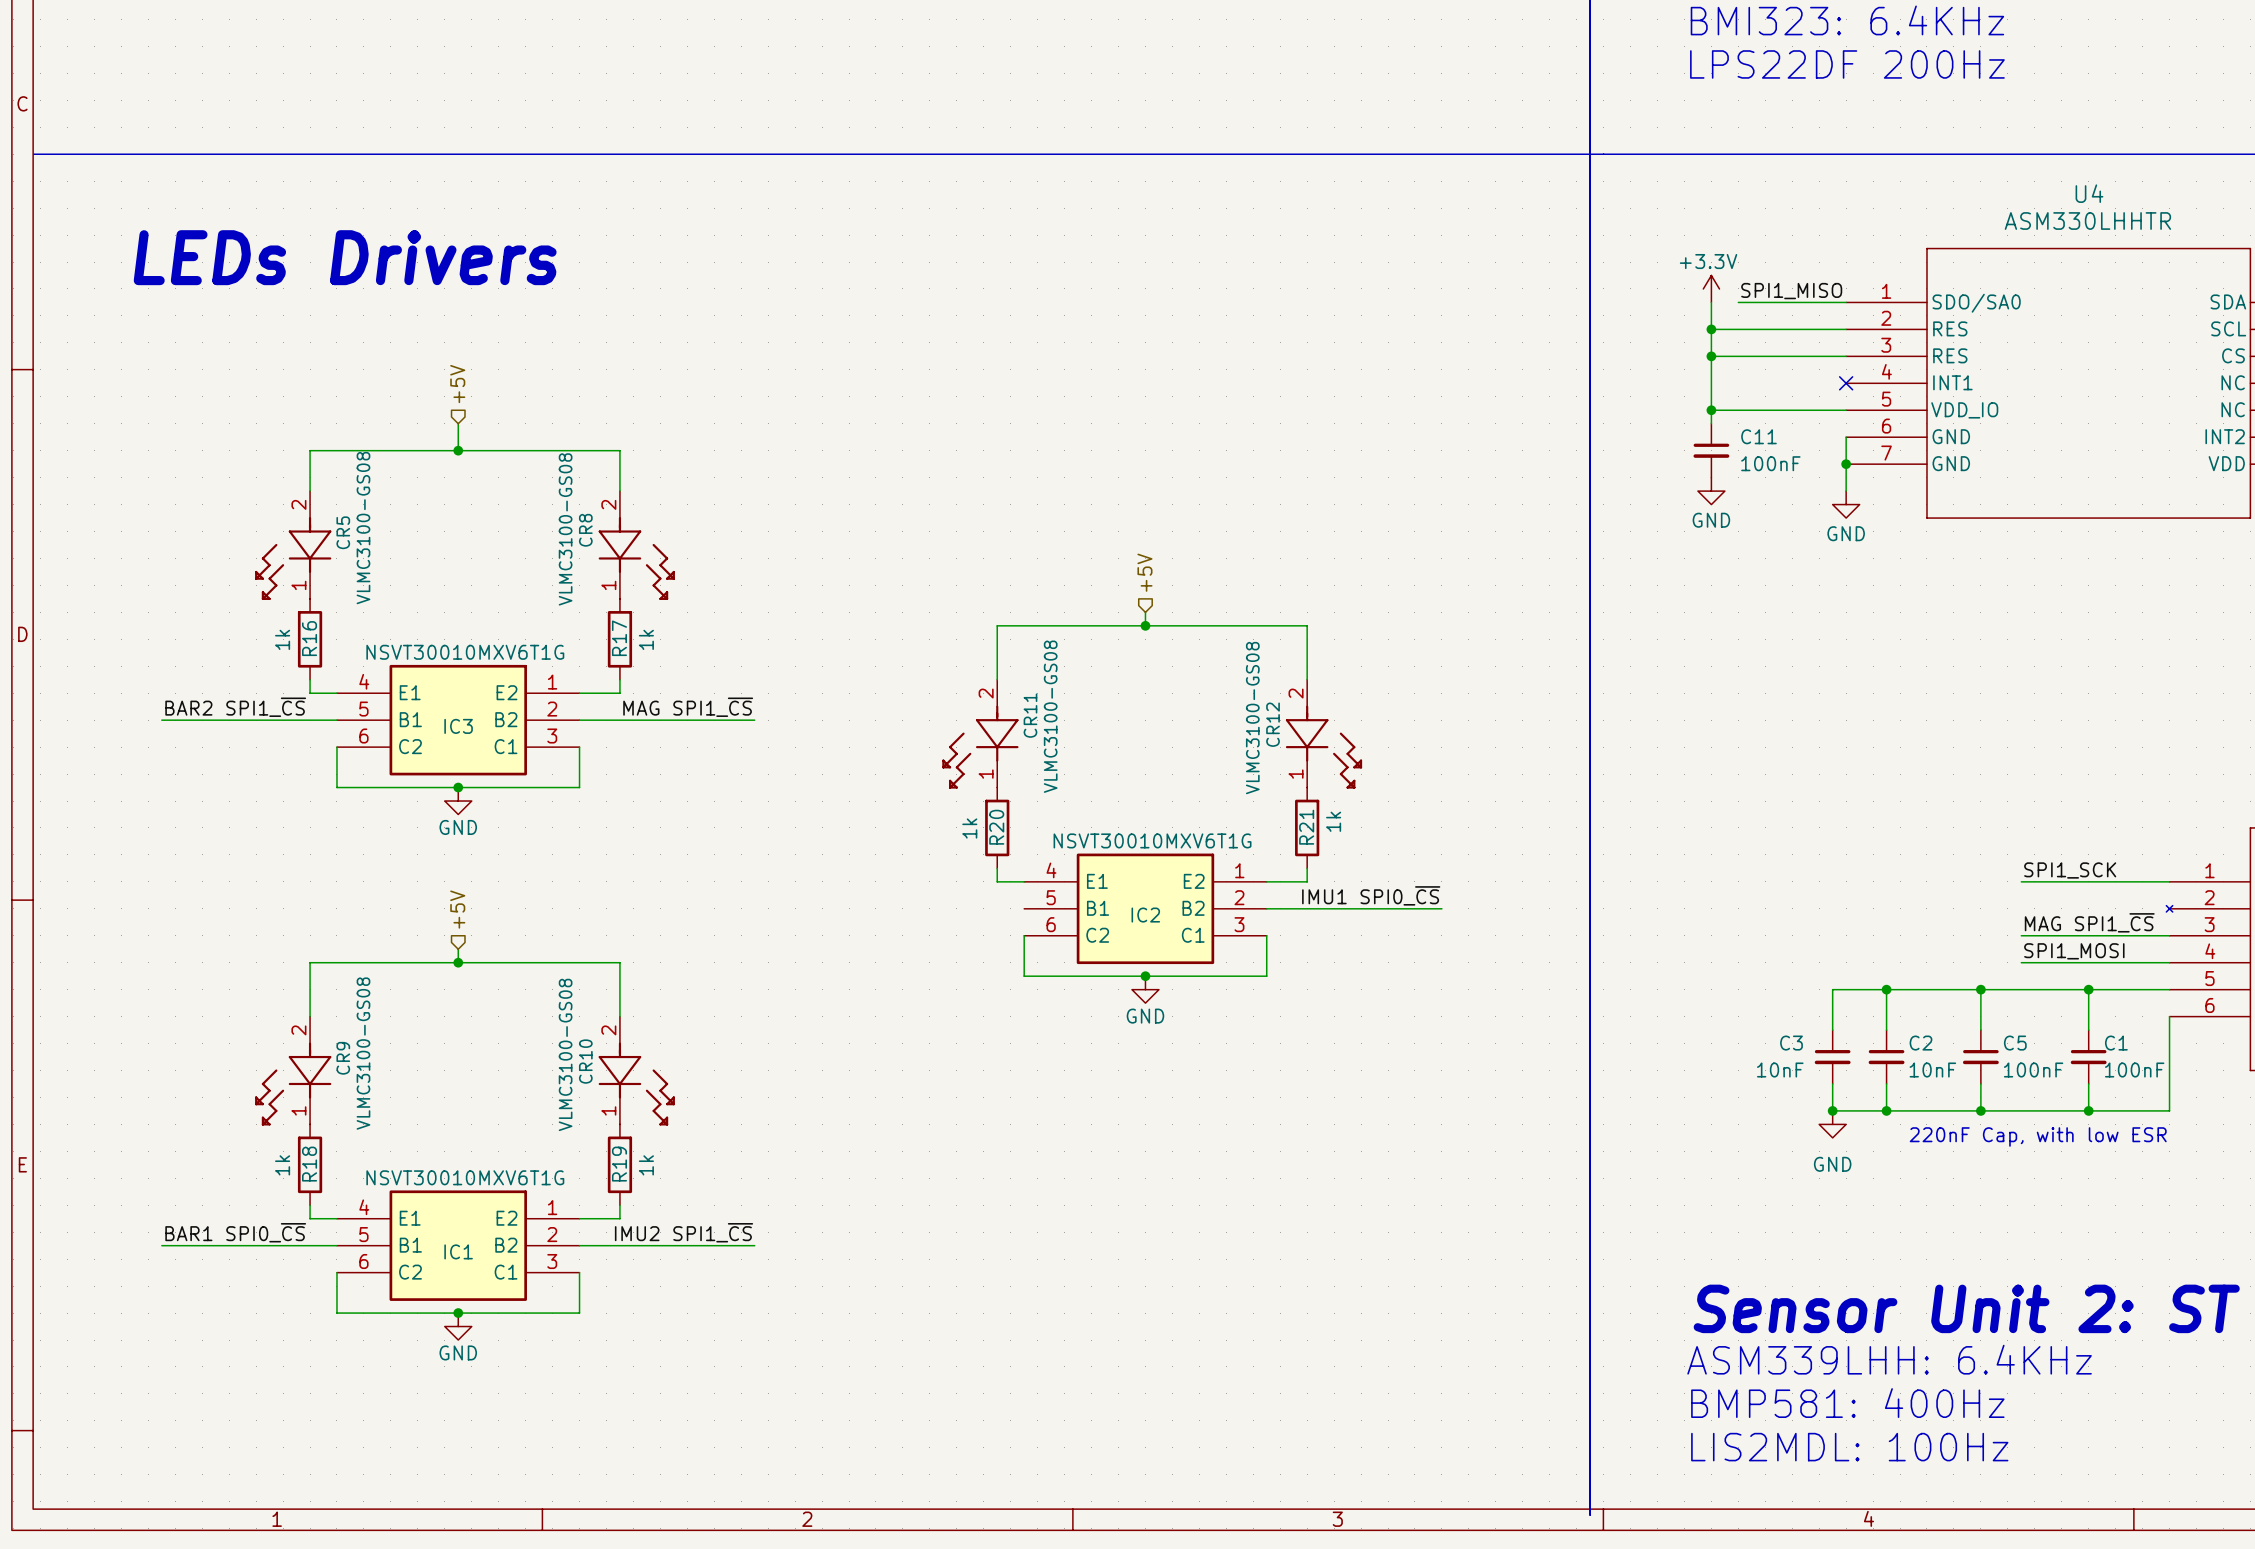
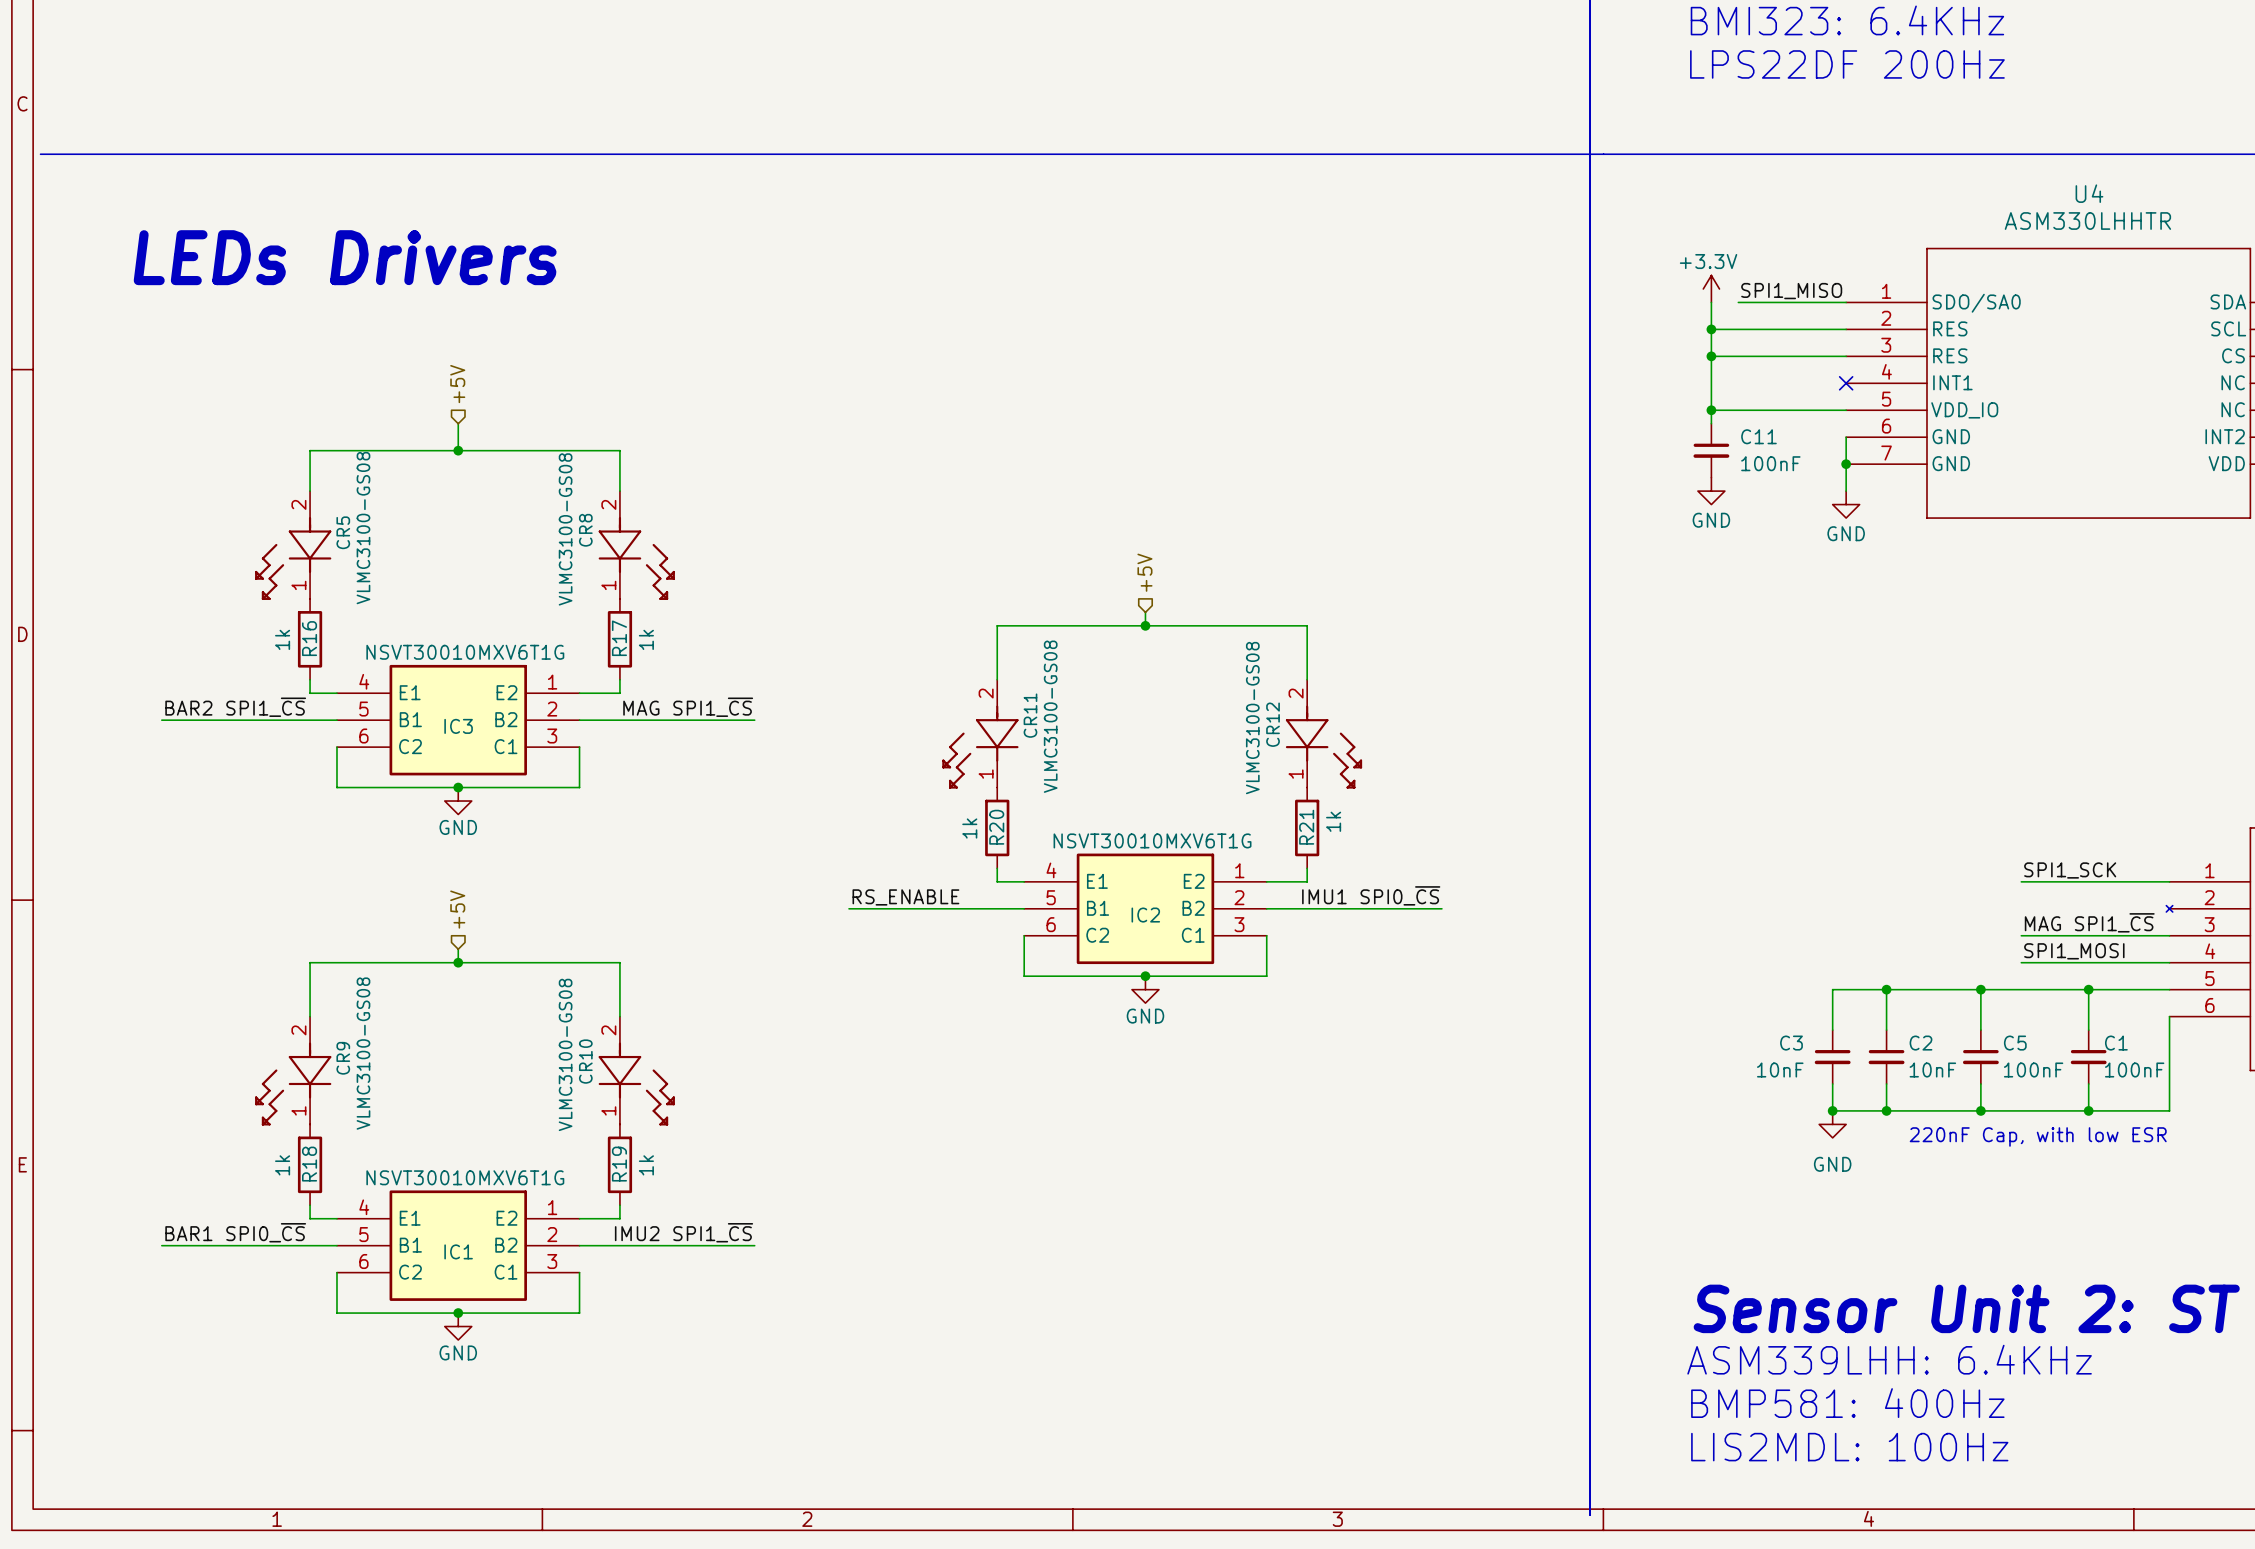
line: (33, 154) (40, 154) -> none
label: none -> RS_ENABLE (905, 897)
wire: none -> (849, 908) (1024, 908)

